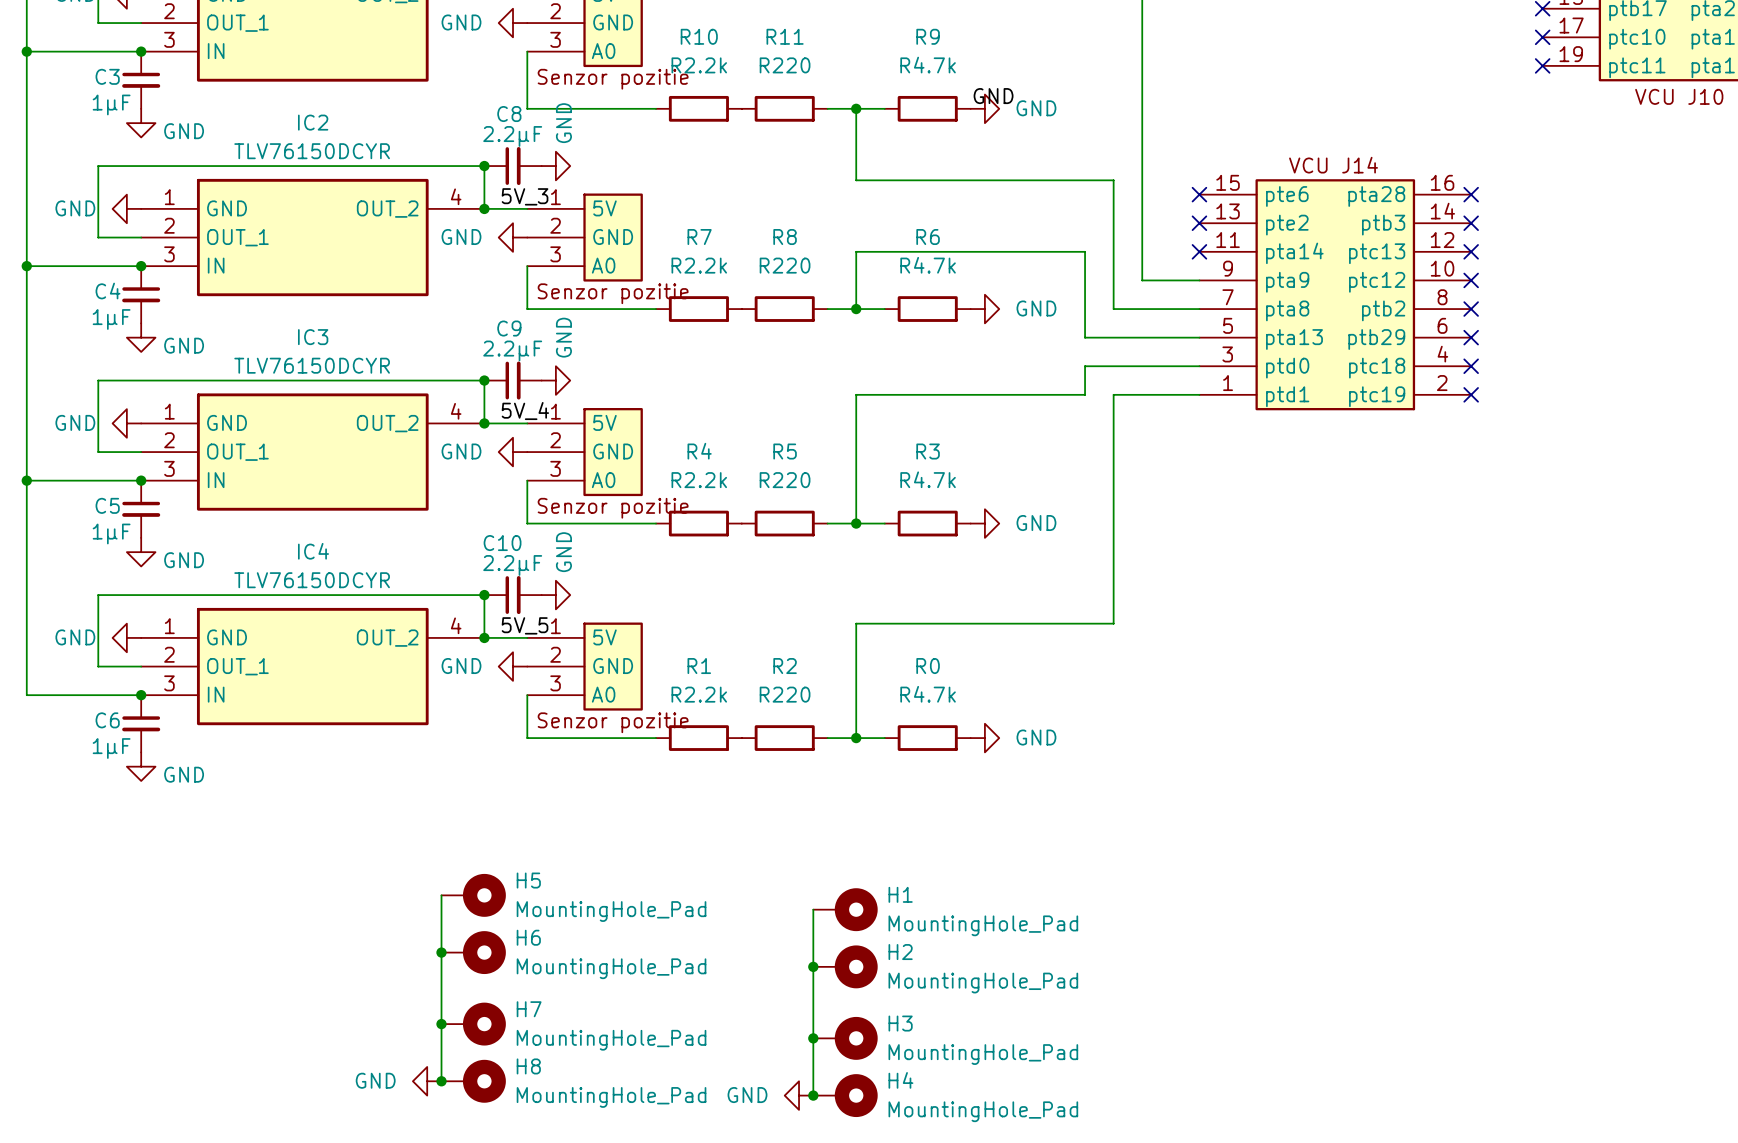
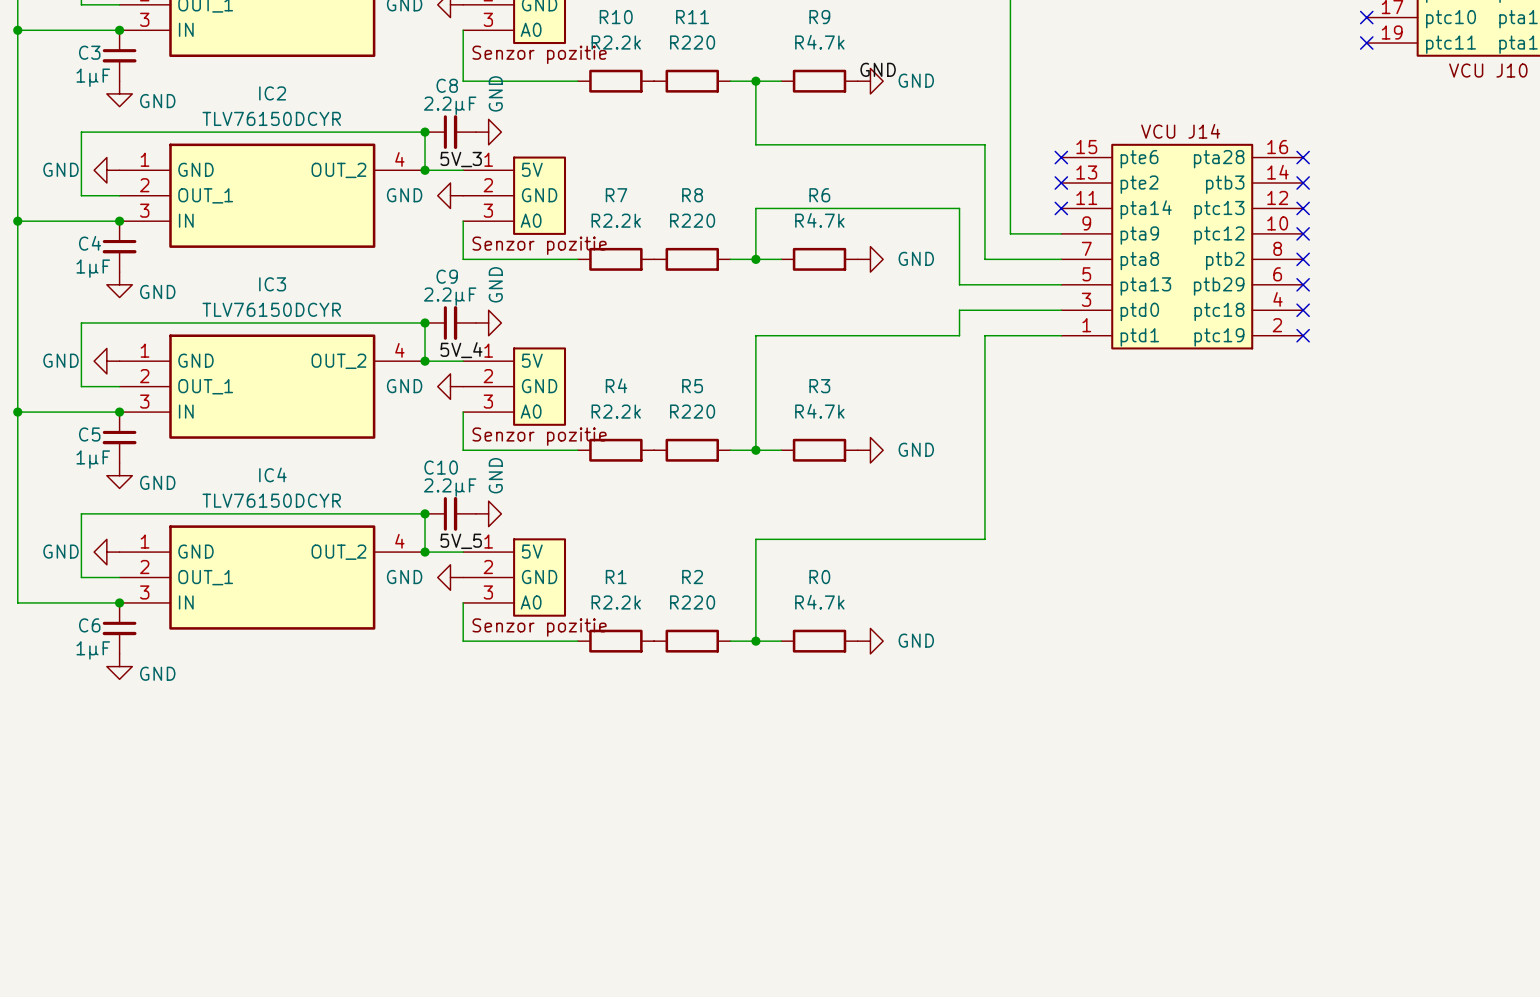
wire: (441, 895) (441, 1081) -> none
H5: MountingHole_Pad (473, 895) -> none
wire: (813, 909) (813, 1095) -> none
H1: MountingHole_Pad (845, 909) -> none
junction: (441, 952) -> none
H6: MountingHole_Pad (473, 952) -> none
junction: (813, 966) -> none
H2: MountingHole_Pad (845, 966) -> none
junction: (441, 1024) -> none
H7: MountingHole_Pad (473, 1024) -> none
junction: (813, 1038) -> none
H3: MountingHole_Pad (845, 1038) -> none
power symbol: GND (427, 1081) -> none
junction: (441, 1081) -> none
H8: MountingHole_Pad (473, 1081) -> none
power symbol: GND (799, 1095) -> none
junction: (813, 1095) -> none
H4: MountingHole_Pad (845, 1095) -> none

